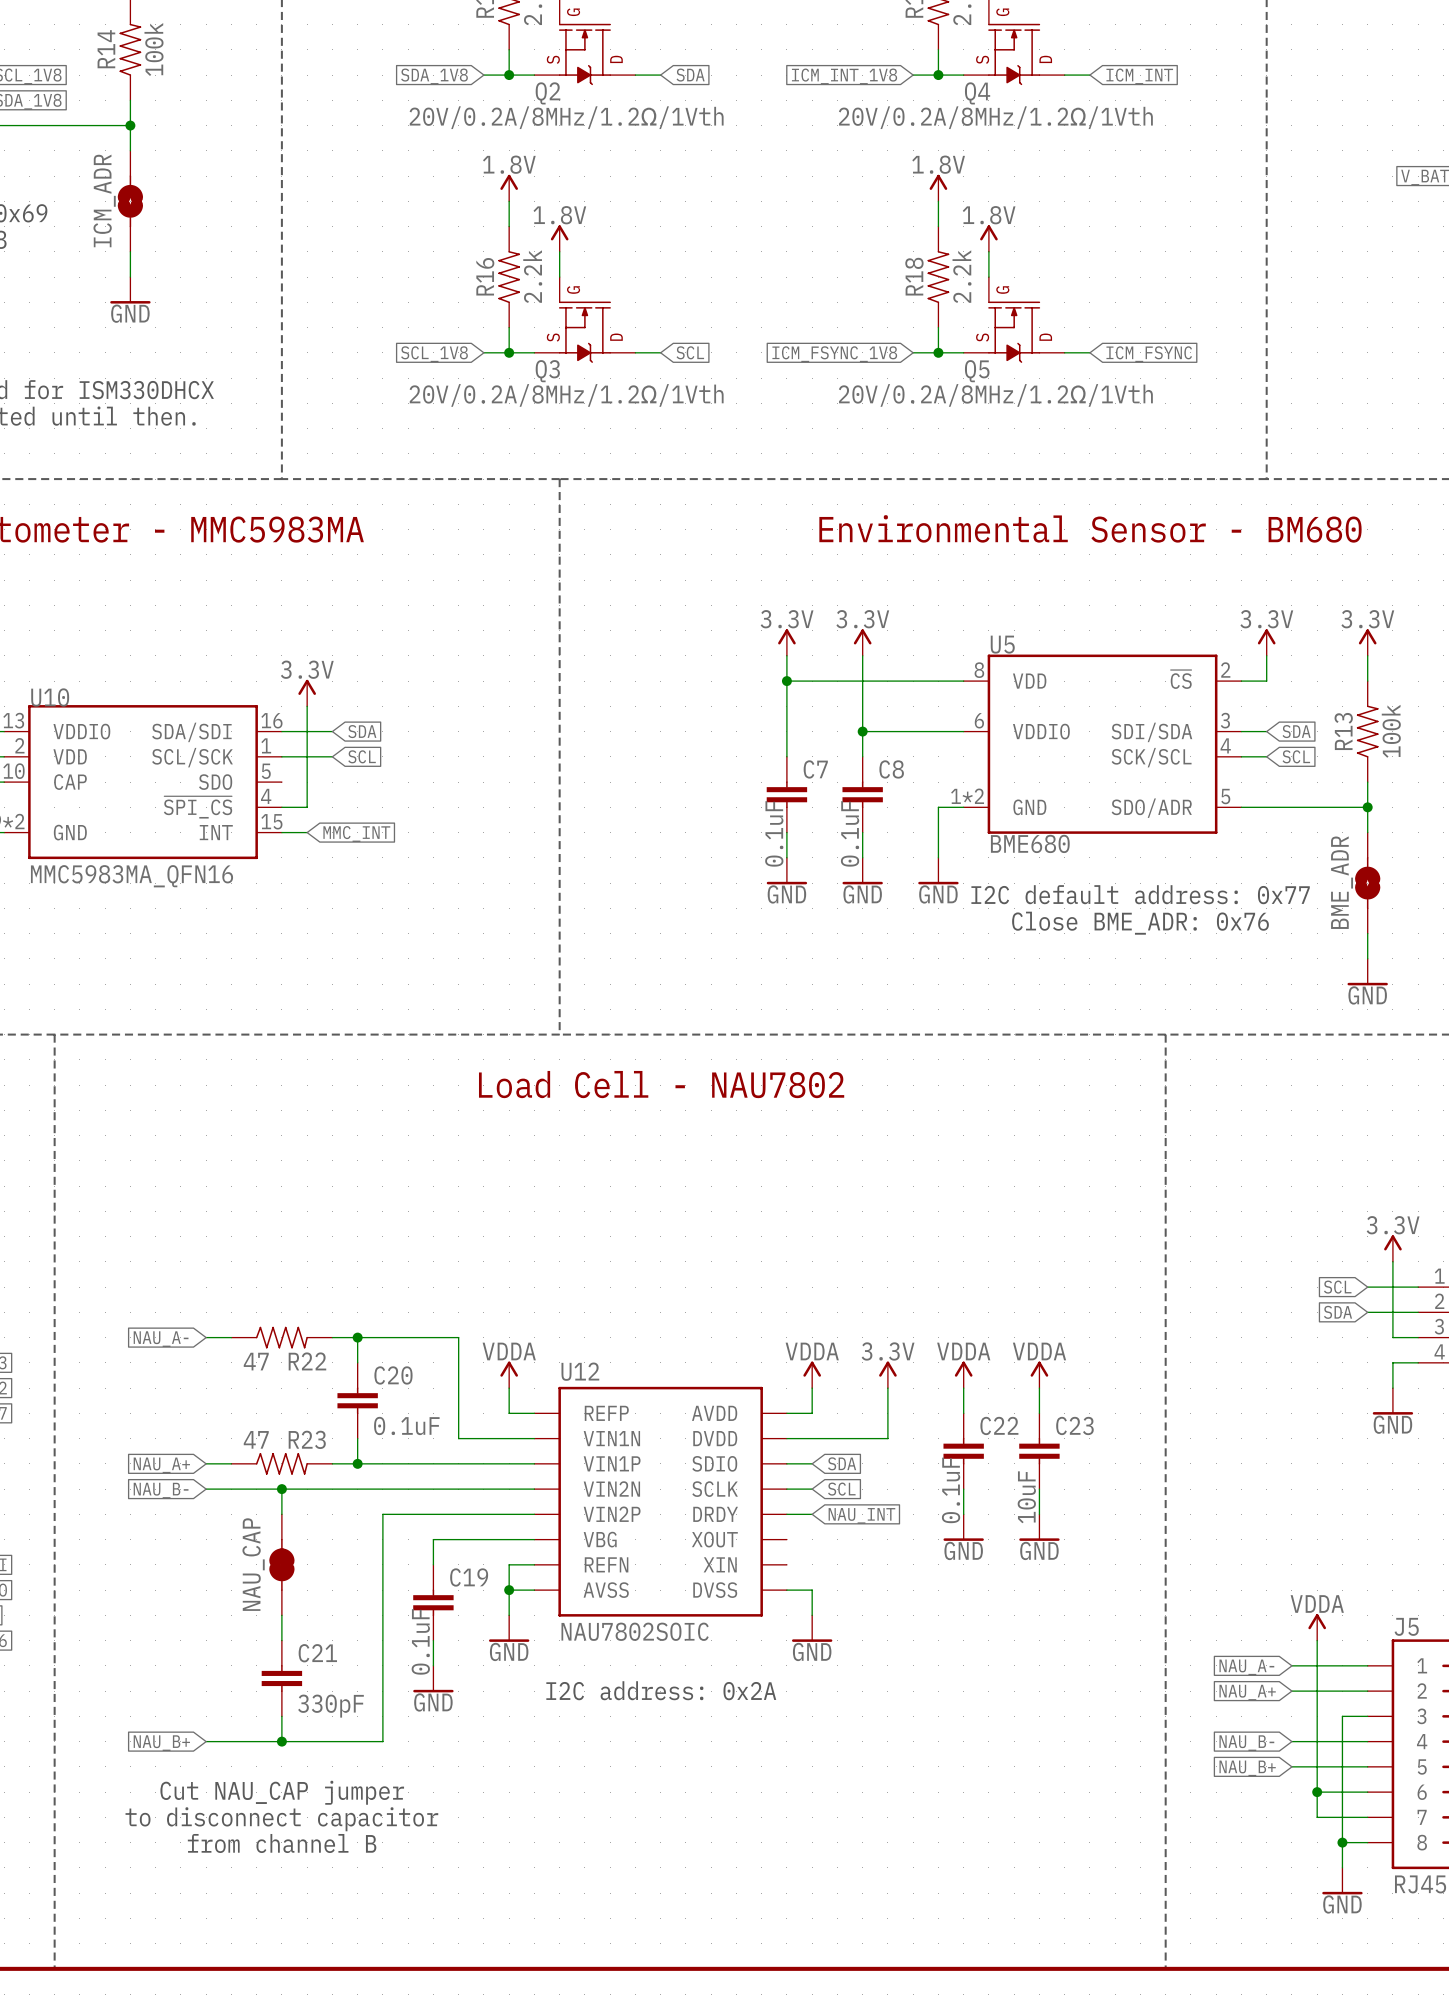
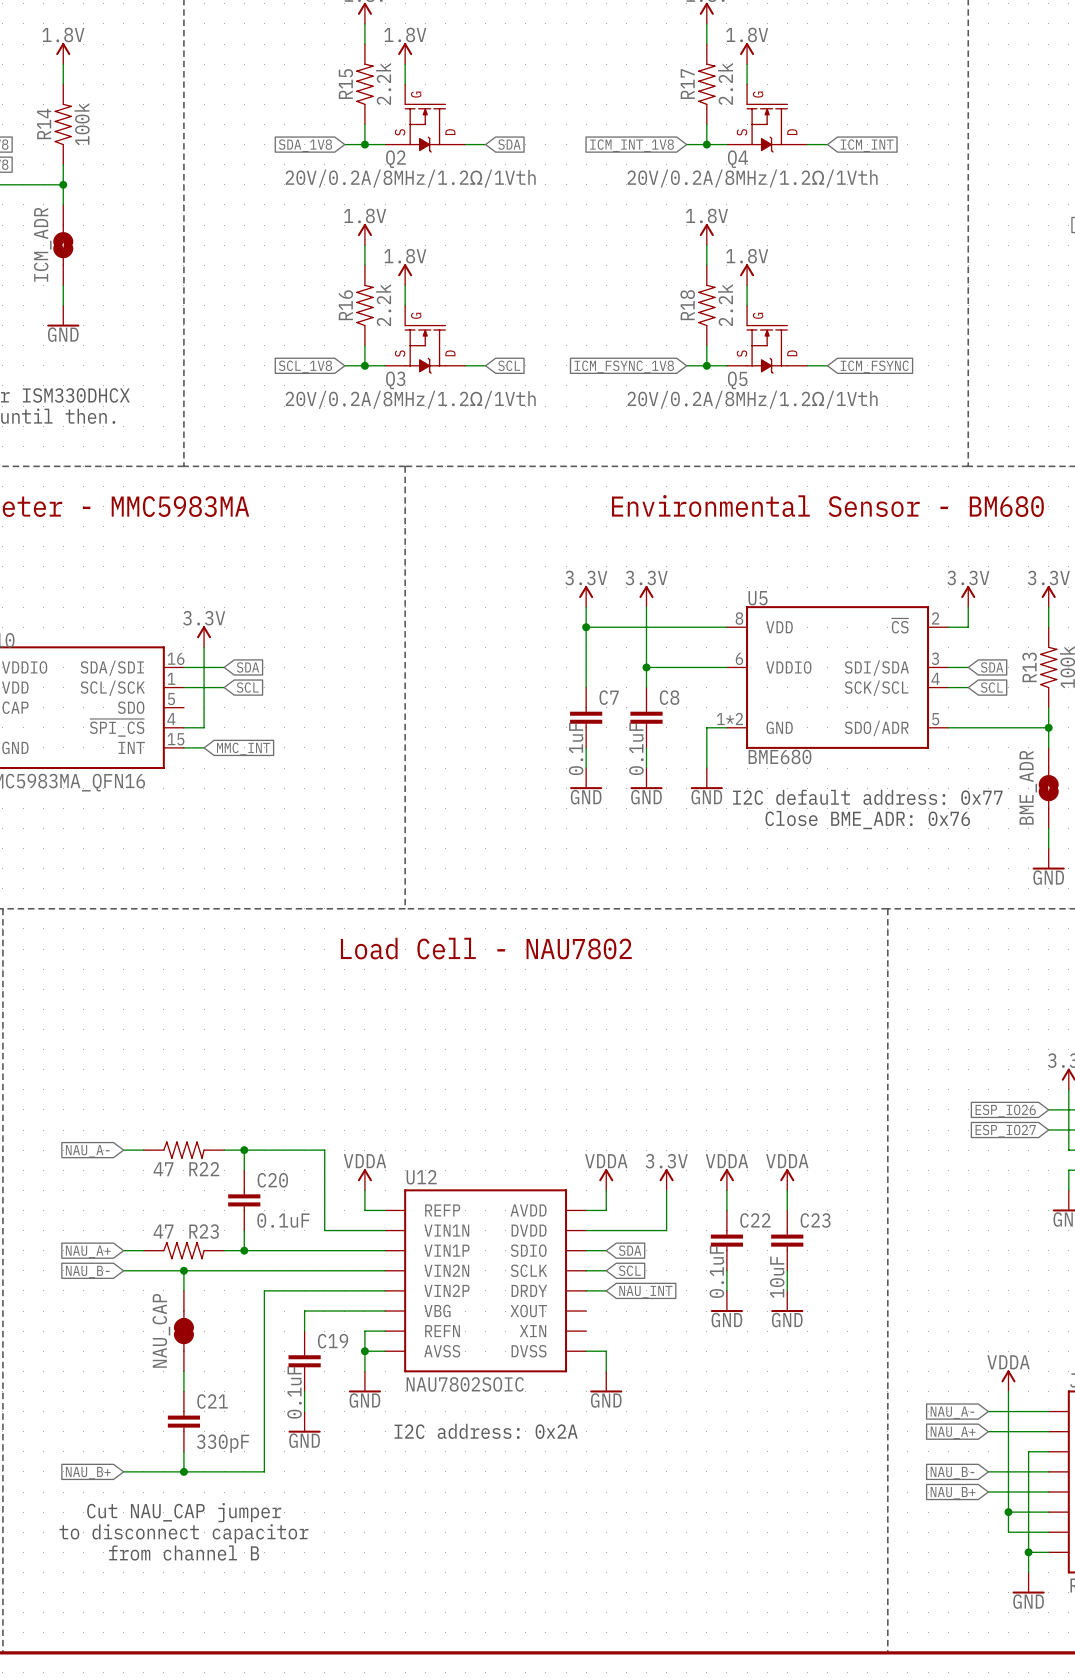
global label: SCL (1337, 1287) -> ESP_IO26 (1005, 1111)
global label: SDA (1338, 1312) -> ESP_IO27 (1005, 1131)

